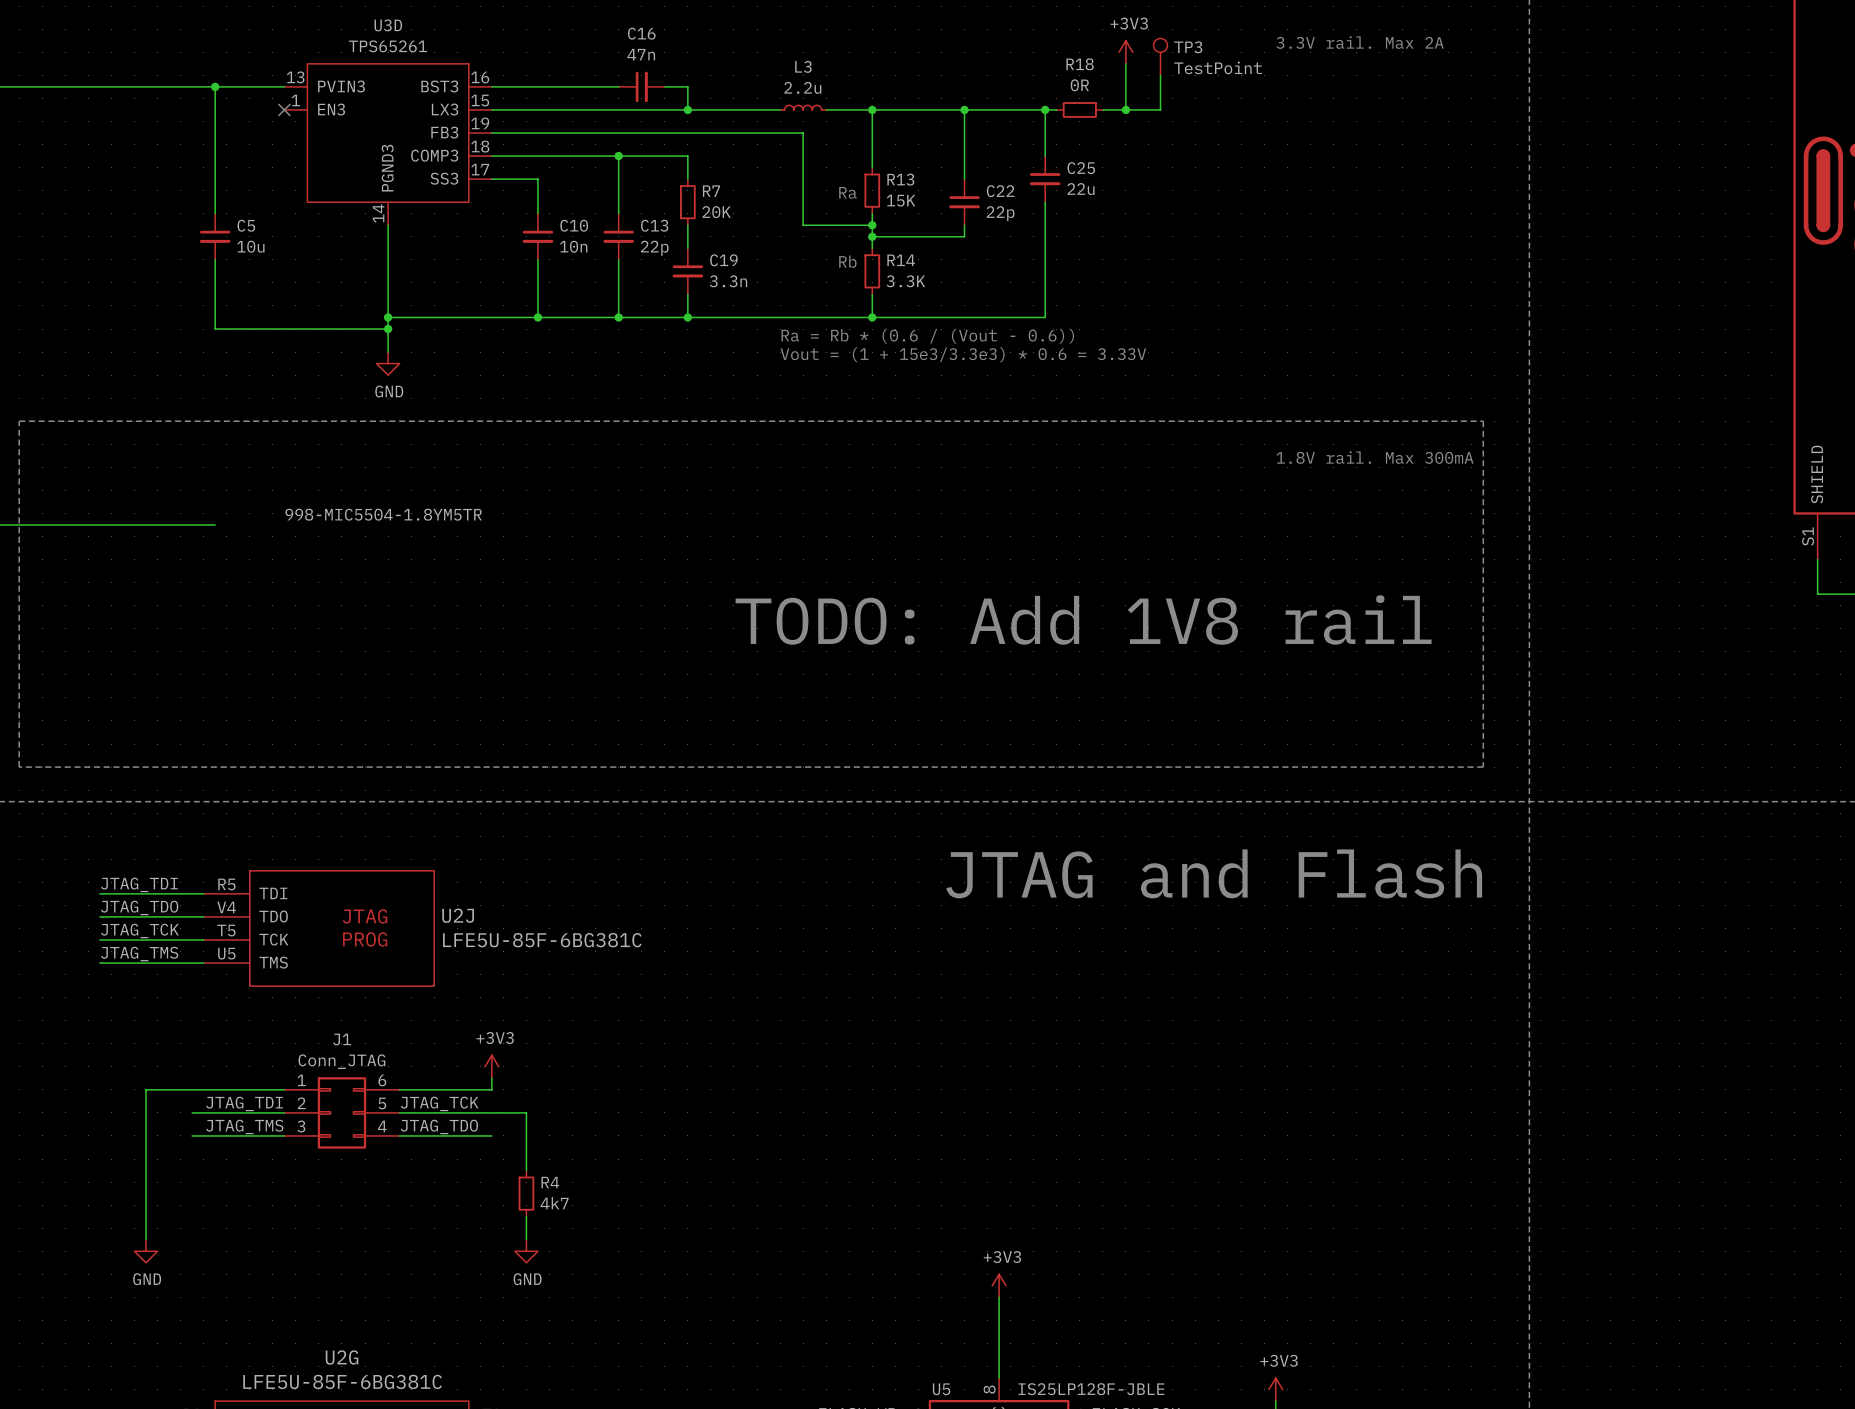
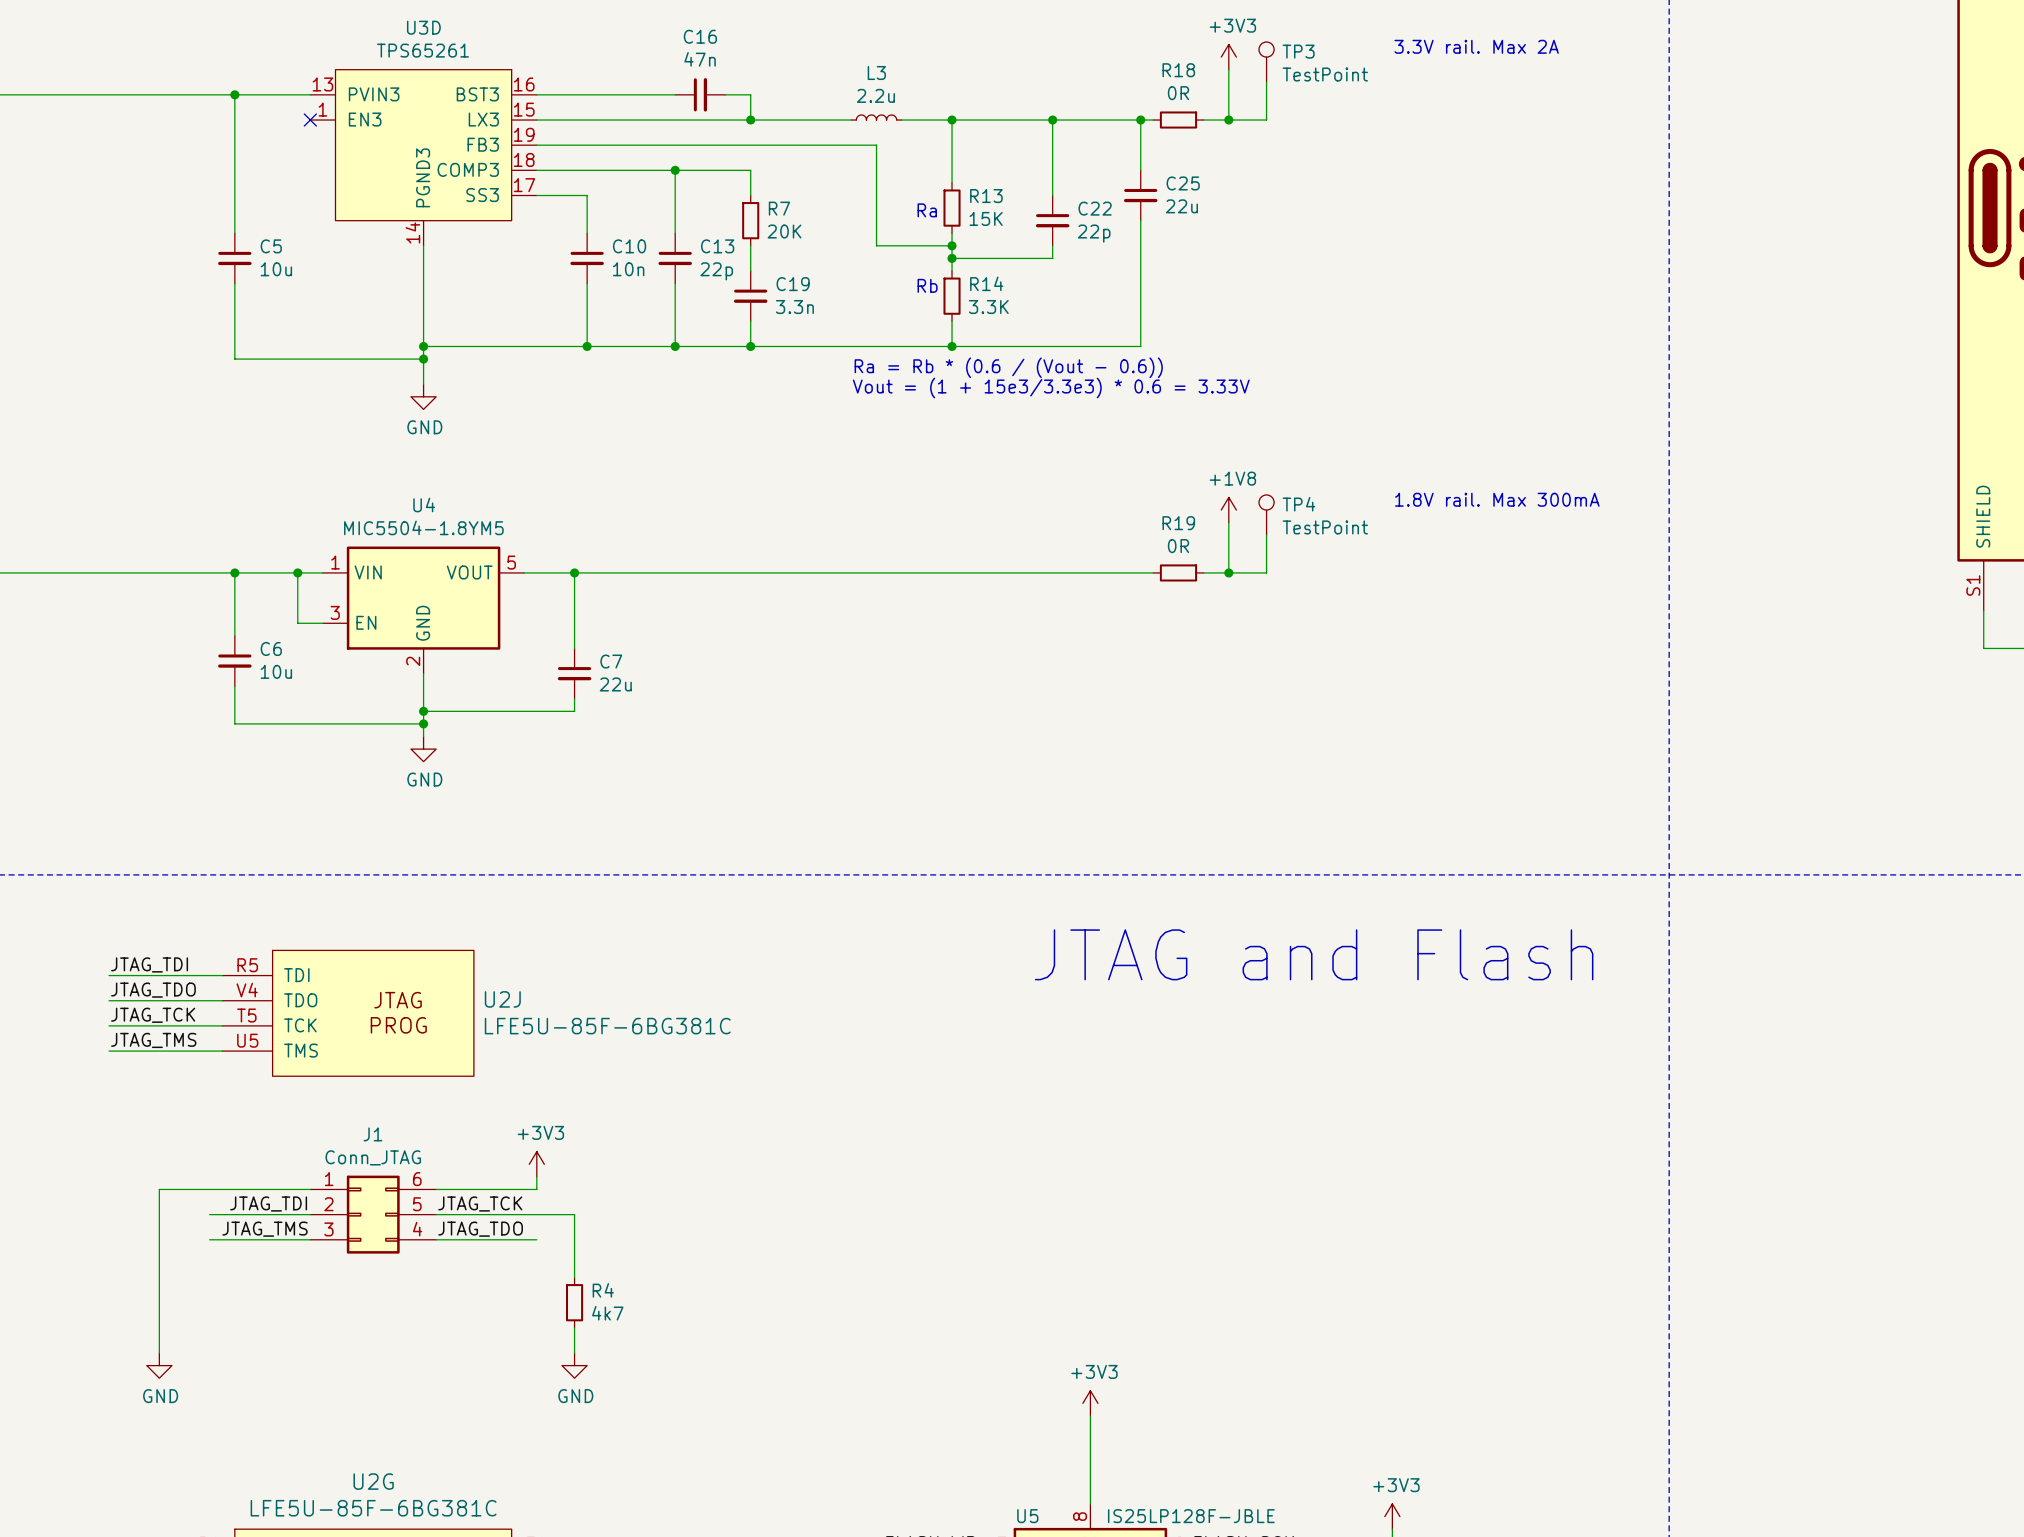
line: (19, 421) (19, 767) (1483, 767) (1483, 421) (19, 421) -> none
power symbol: none -> +1V8 (1228, 510)
TP4: none -> TestPoint (1266, 515)
wire: none -> (1228, 522) (1228, 572)
wire: none -> (1266, 535) (1266, 572) (1203, 572)
label: 998-MIC5504-1.8YM5TR (383, 514) -> none
junction: none -> (234, 572)
wire: none -> (297, 572) (297, 623) (322, 623)
junction: none -> (297, 572)
wire: none -> (322, 572) (234, 572) (234, 635)
wire: none -> (524, 572) (1153, 572)
wire: none -> (574, 572) (574, 648)
junction: none -> (574, 572)
R19: none -> 0R (1178, 572)
junction: none -> (1228, 572)
U4: none -> MIC5504-1.8YM5 (423, 610)
C6: none -> 10u (234, 661)
wire: none -> (423, 673) (423, 736)
C7: none -> 22u (574, 673)
text: TODO: Add 1V8 rail (1083, 620) -> none
wire: none -> (234, 686) (234, 723) (423, 723)
wire: none -> (574, 698) (574, 711) (423, 711)
junction: none -> (423, 711)
junction: none -> (423, 723)
power symbol: none -> GND (423, 749)

